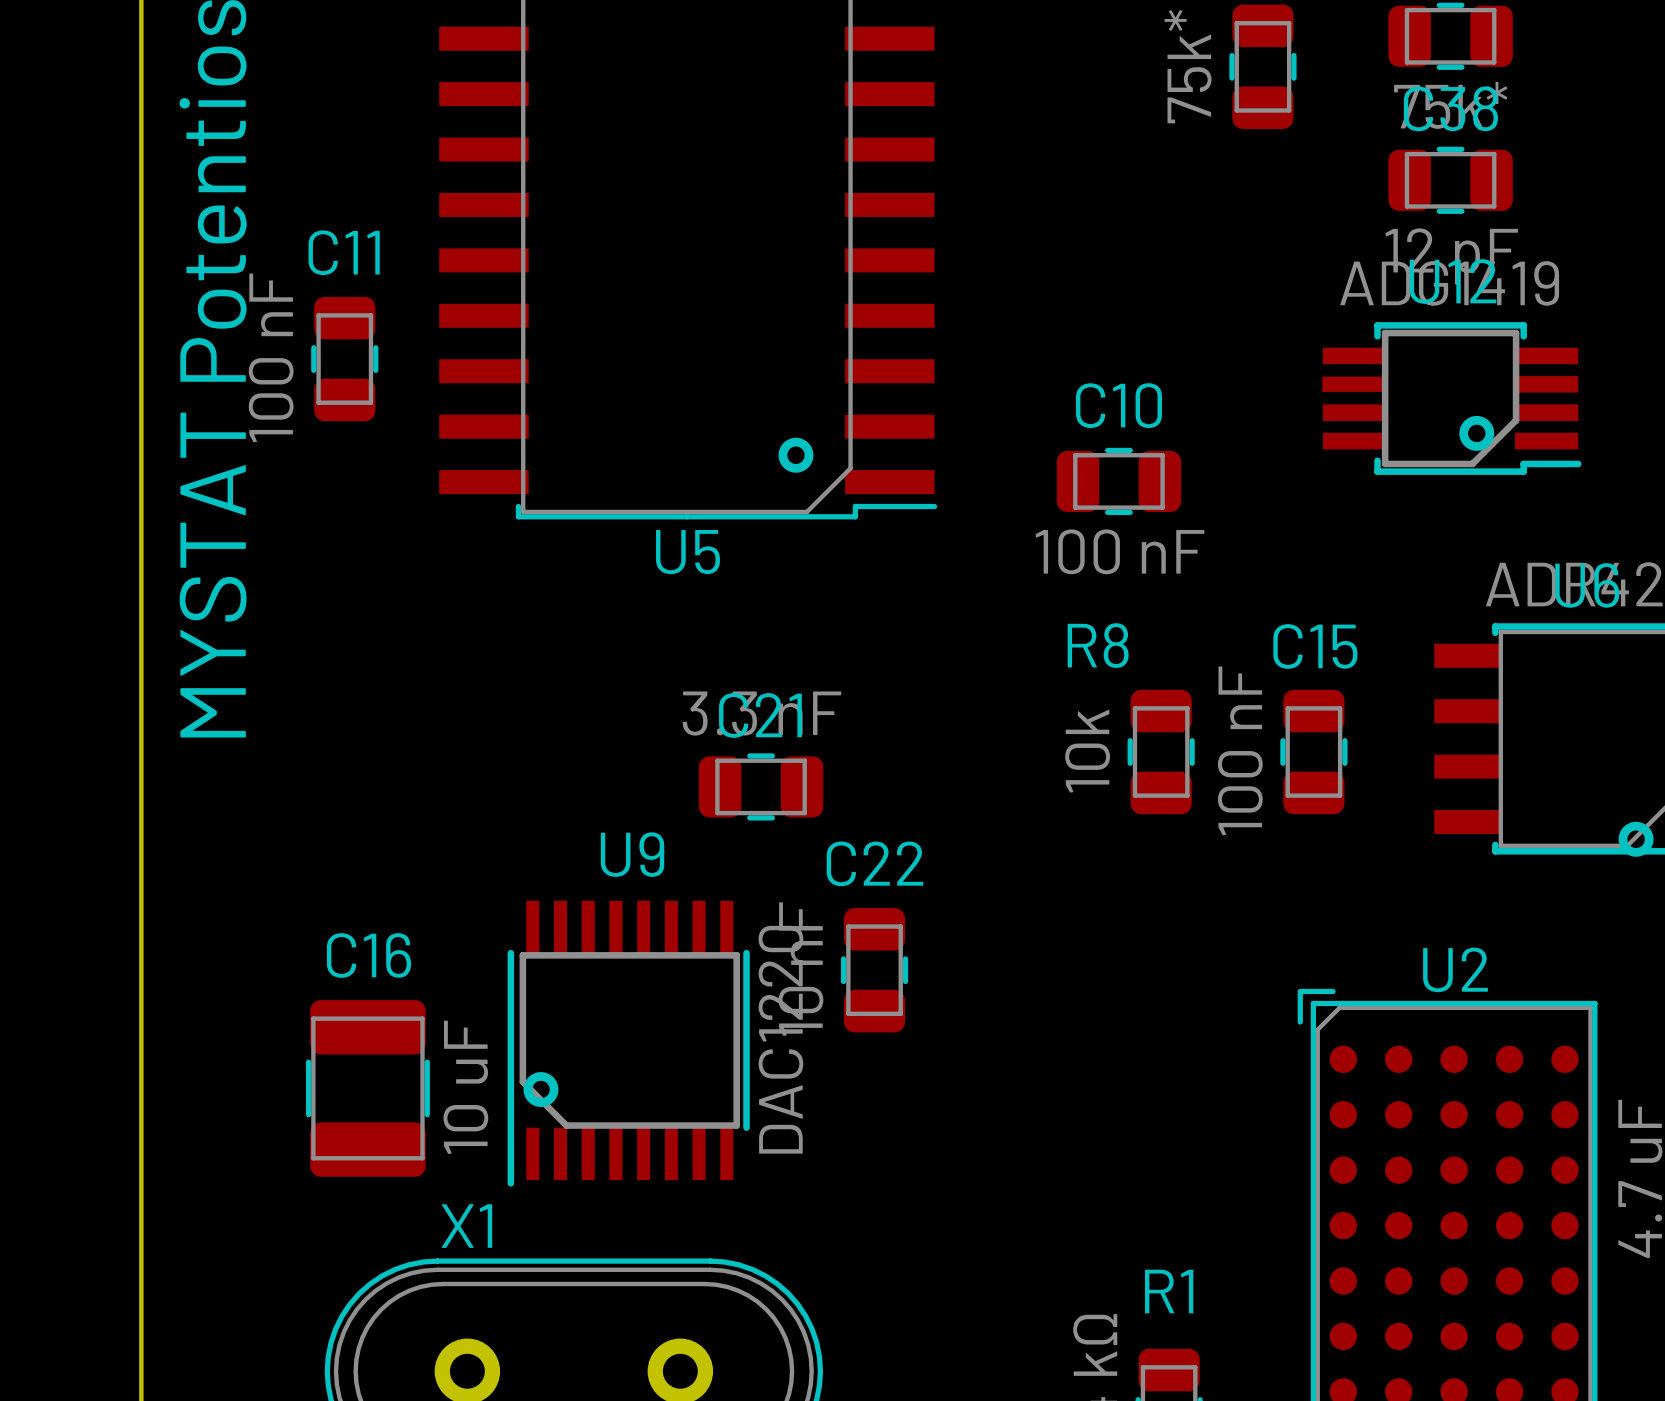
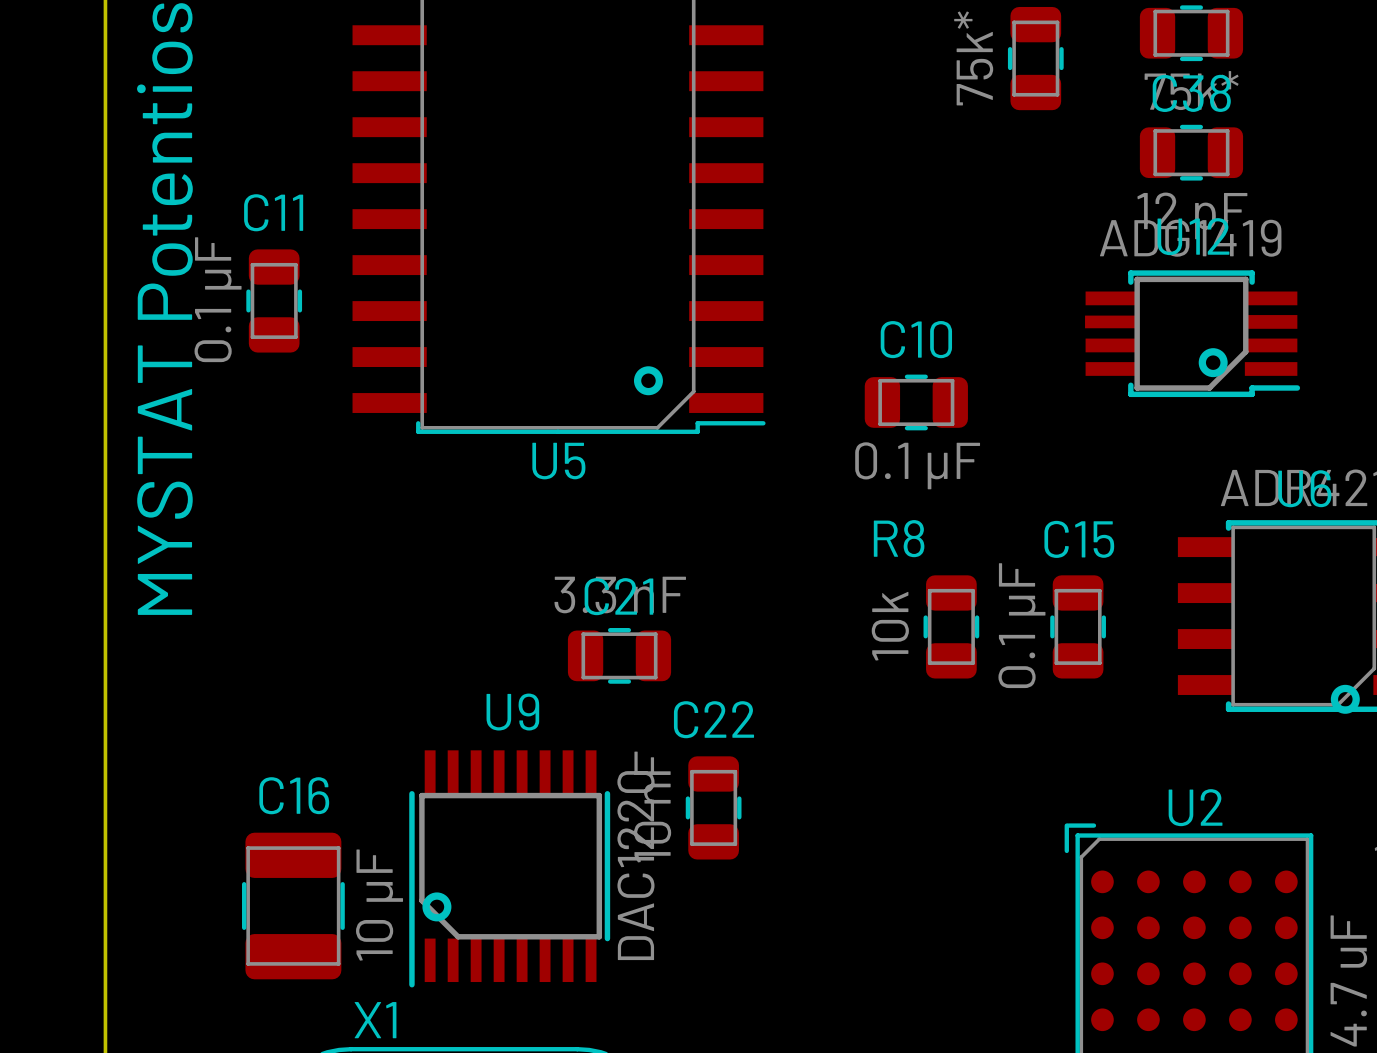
C11 value: 100 nF (271, 357) -> 0.1 µF (218, 299)
C10 value: 100 nF (1120, 551) -> 0.1 µF (917, 465)
C15 value: 100 nF (1240, 750) -> 0.1 µF (1021, 625)
C16 value: 10 uF (465, 1087) -> 10 µF (379, 905)

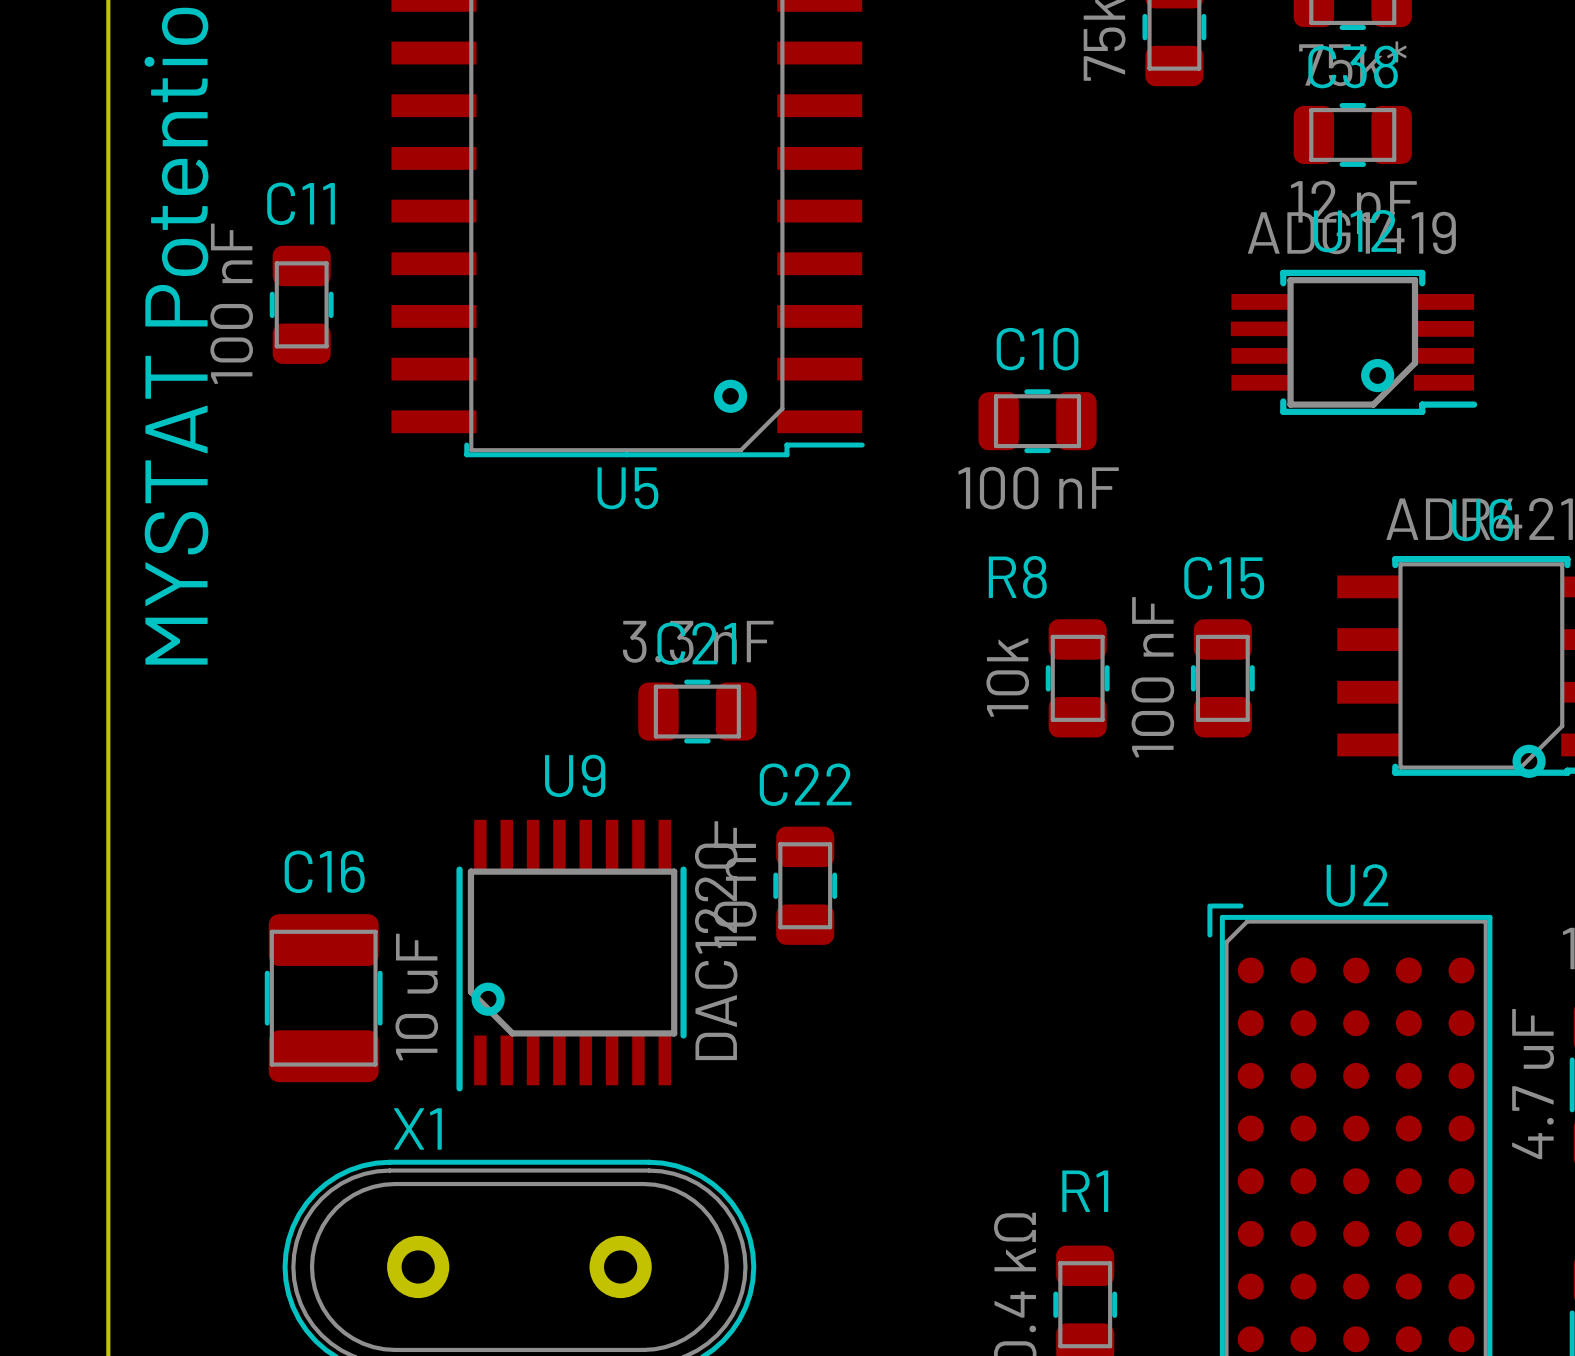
C11 value: 0.1 µF (218, 299) -> 100 nF (231, 303)
C10 value: 0.1 µF (917, 465) -> 100 nF (1038, 488)
C15 value: 0.1 µF (1021, 625) -> 100 nF (1152, 677)
C16 value: 10 µF (379, 905) -> 10 uF (416, 997)

